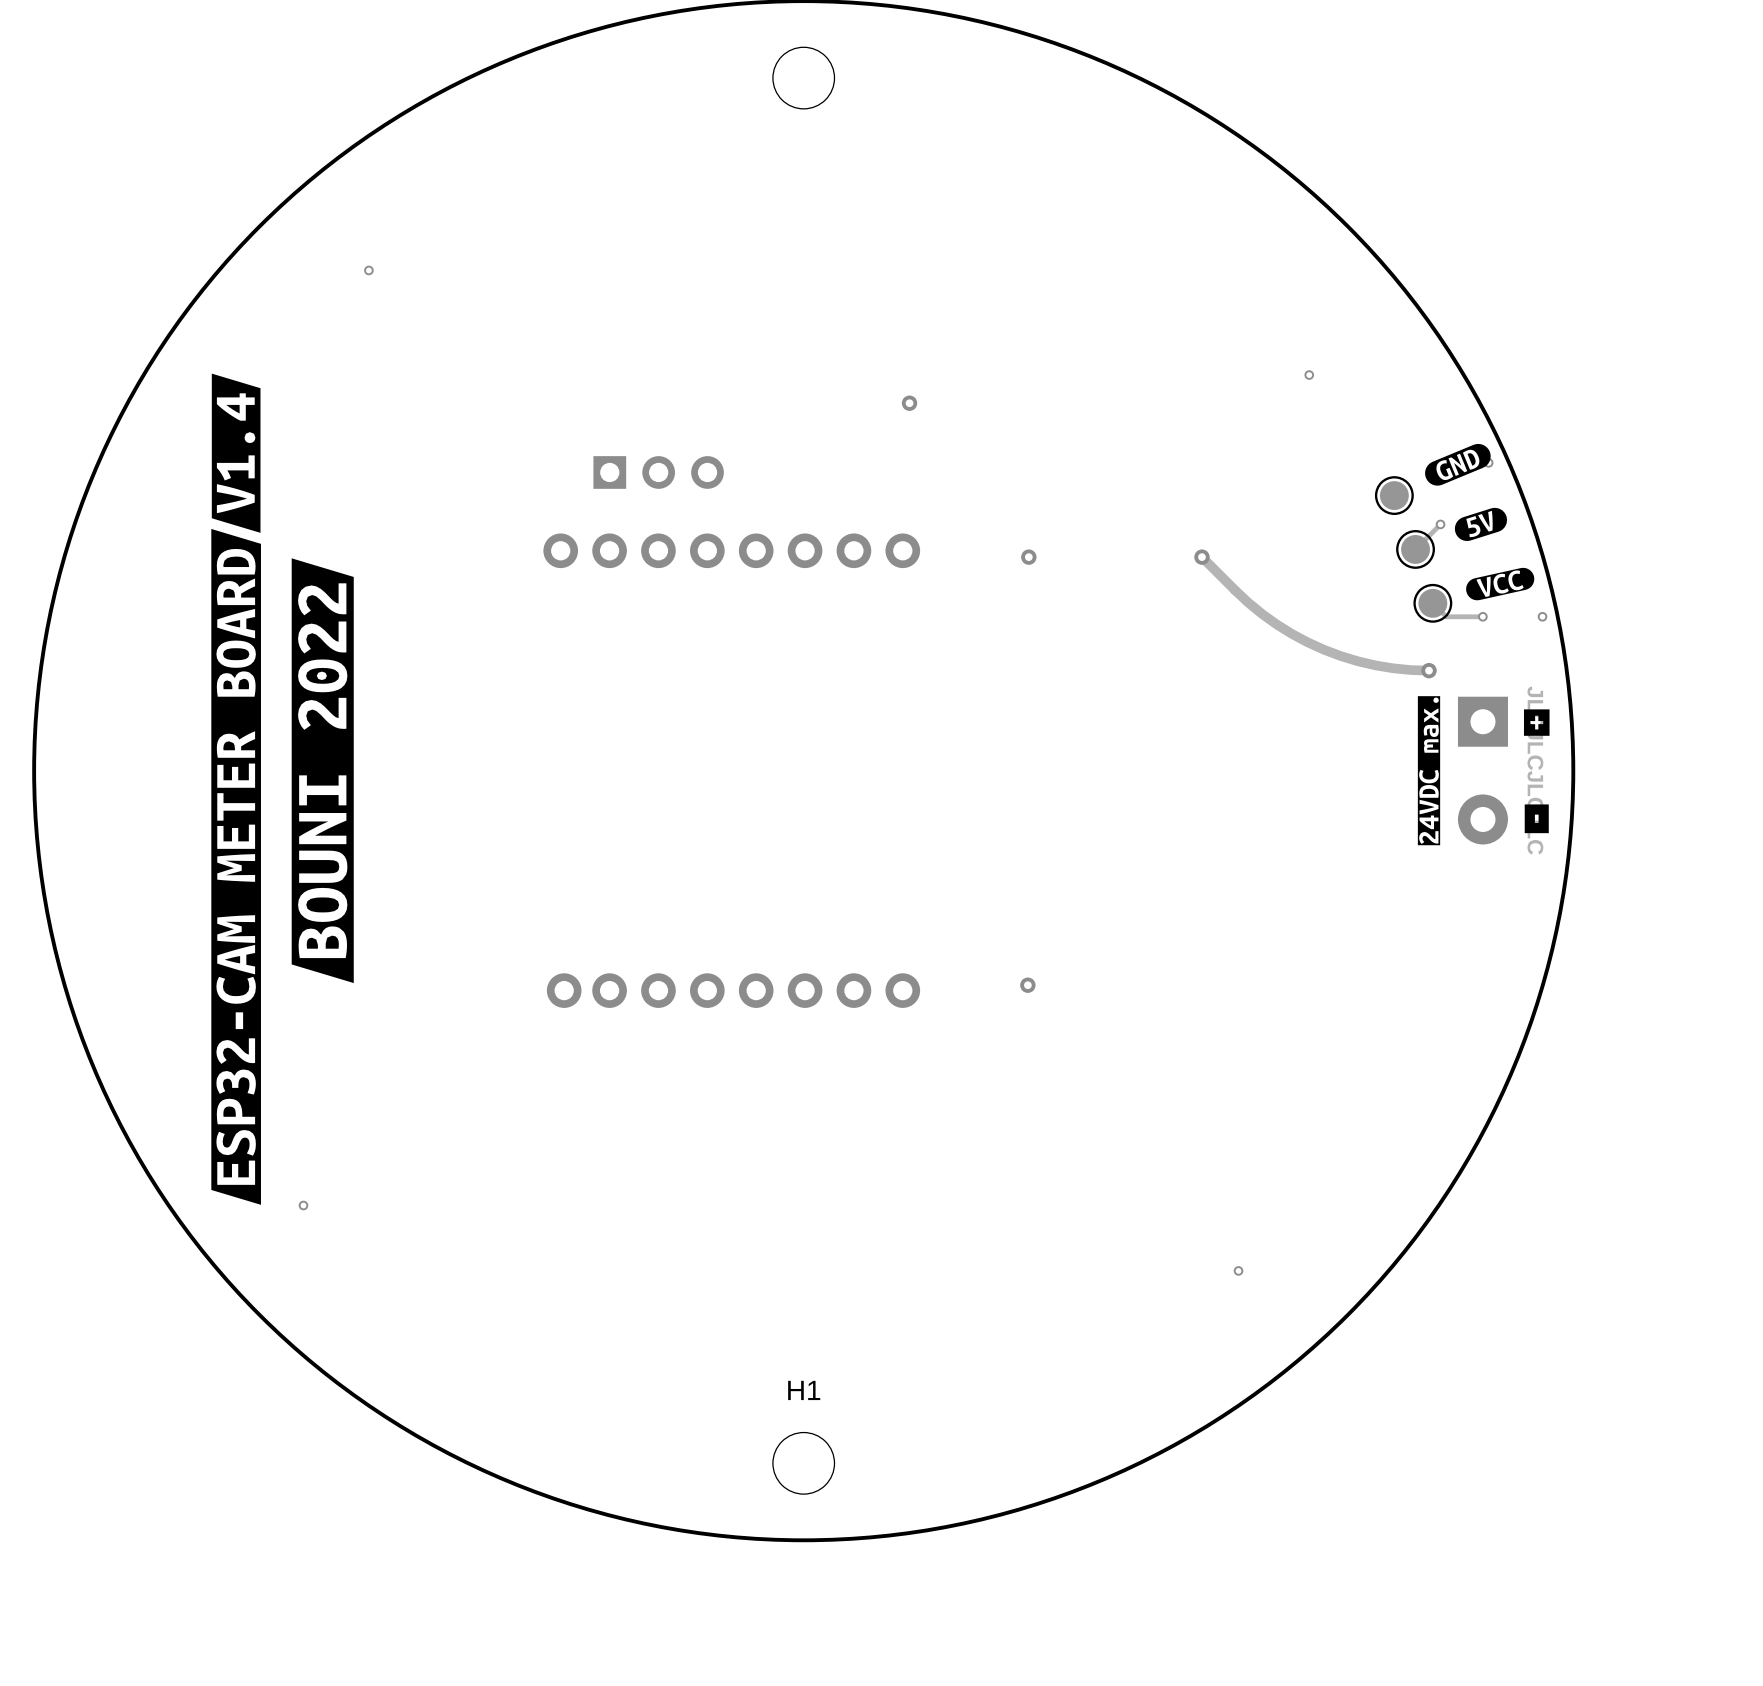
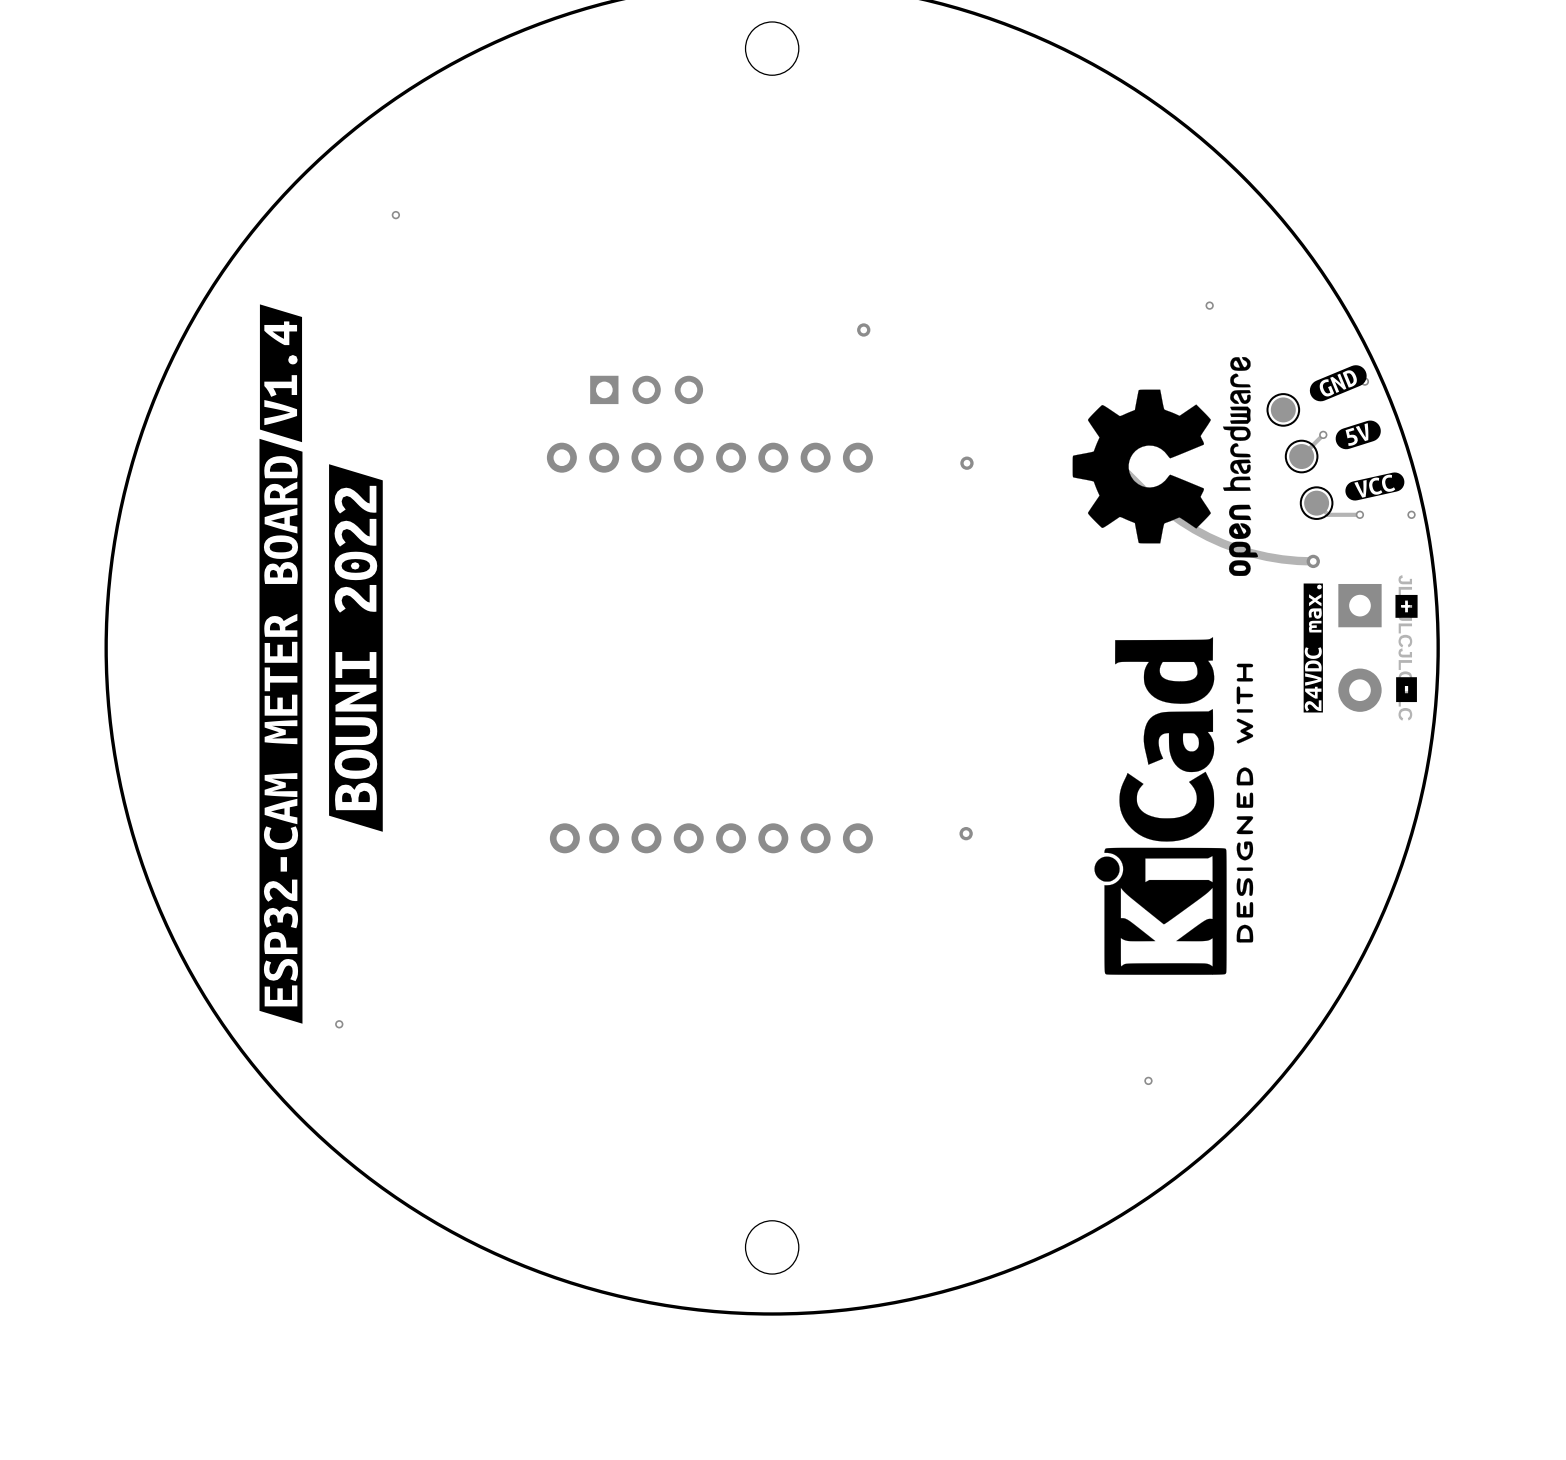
drawing: none -> [1072, 357, 1258, 576]
drawing: none -> [1094, 637, 1254, 975]
H1 name: H1 (804, 1390) -> none

